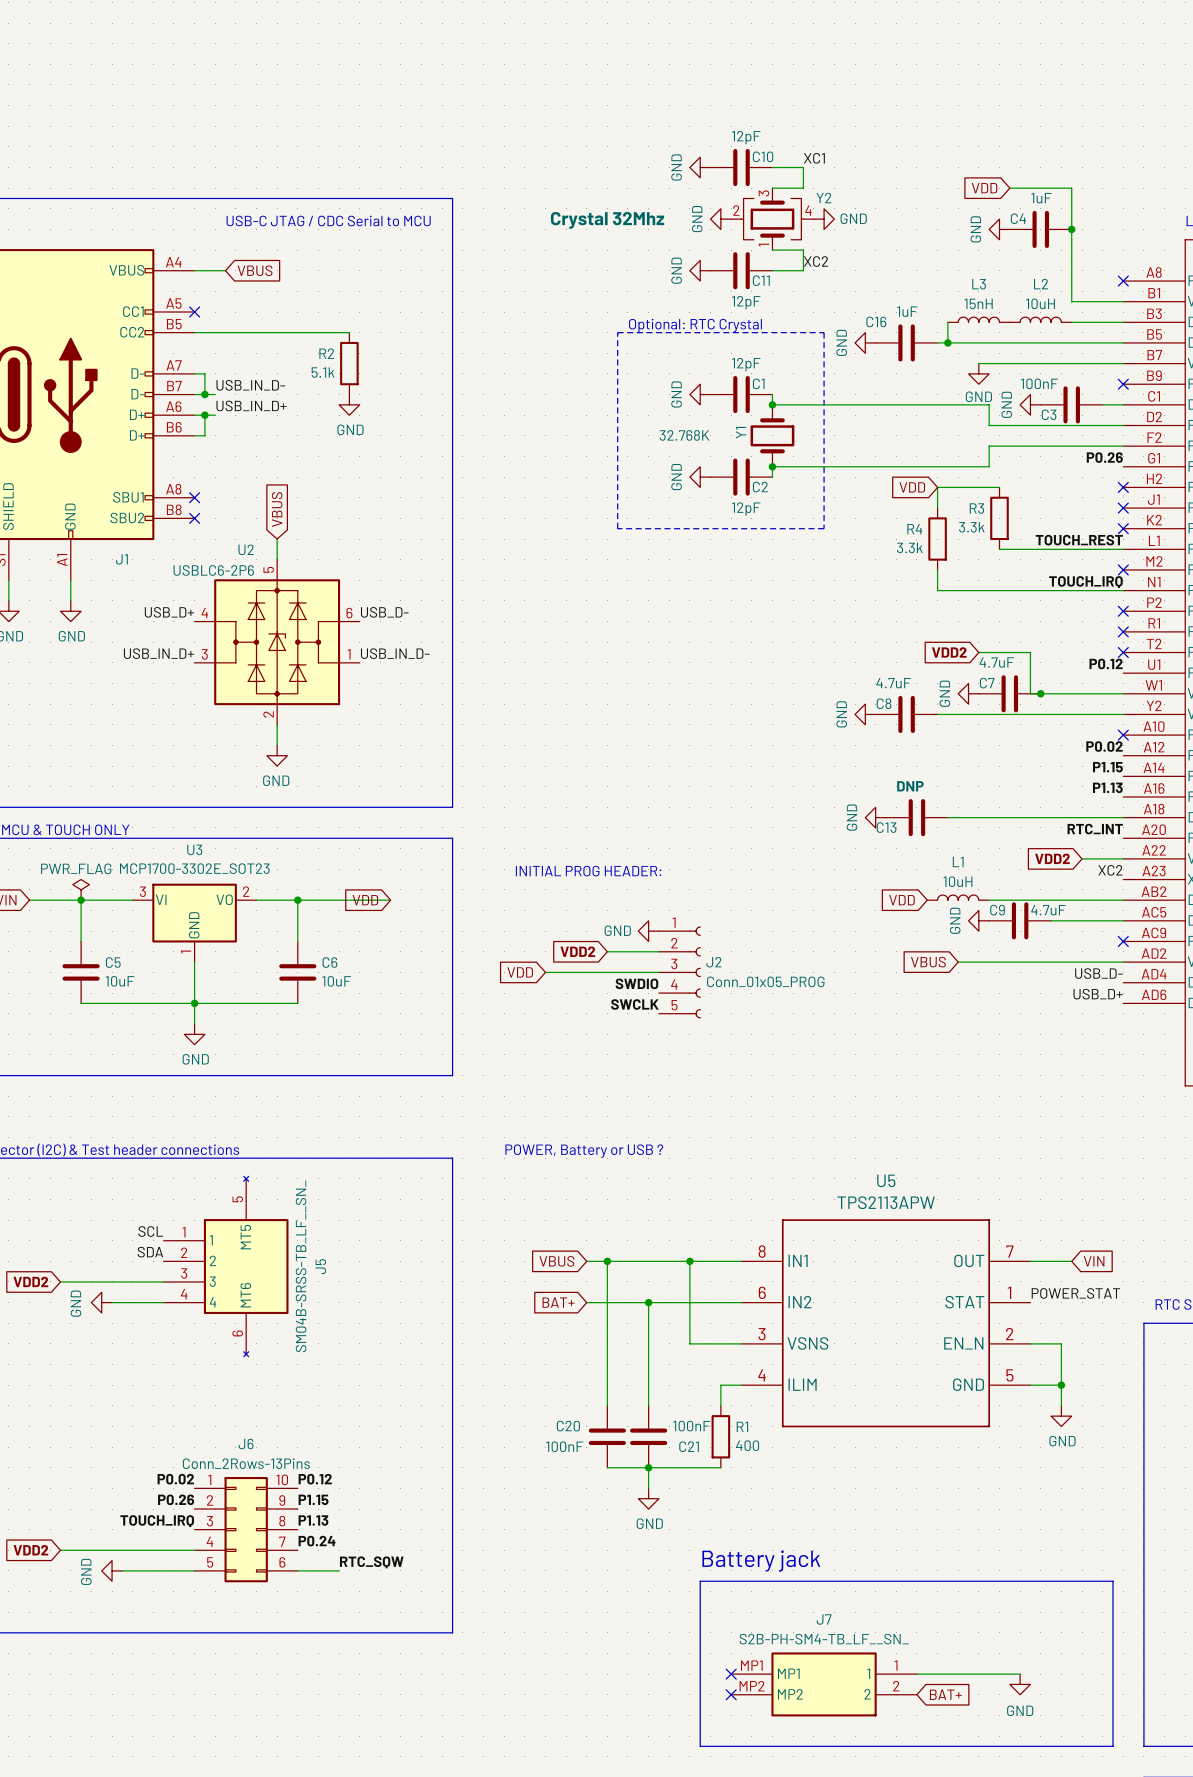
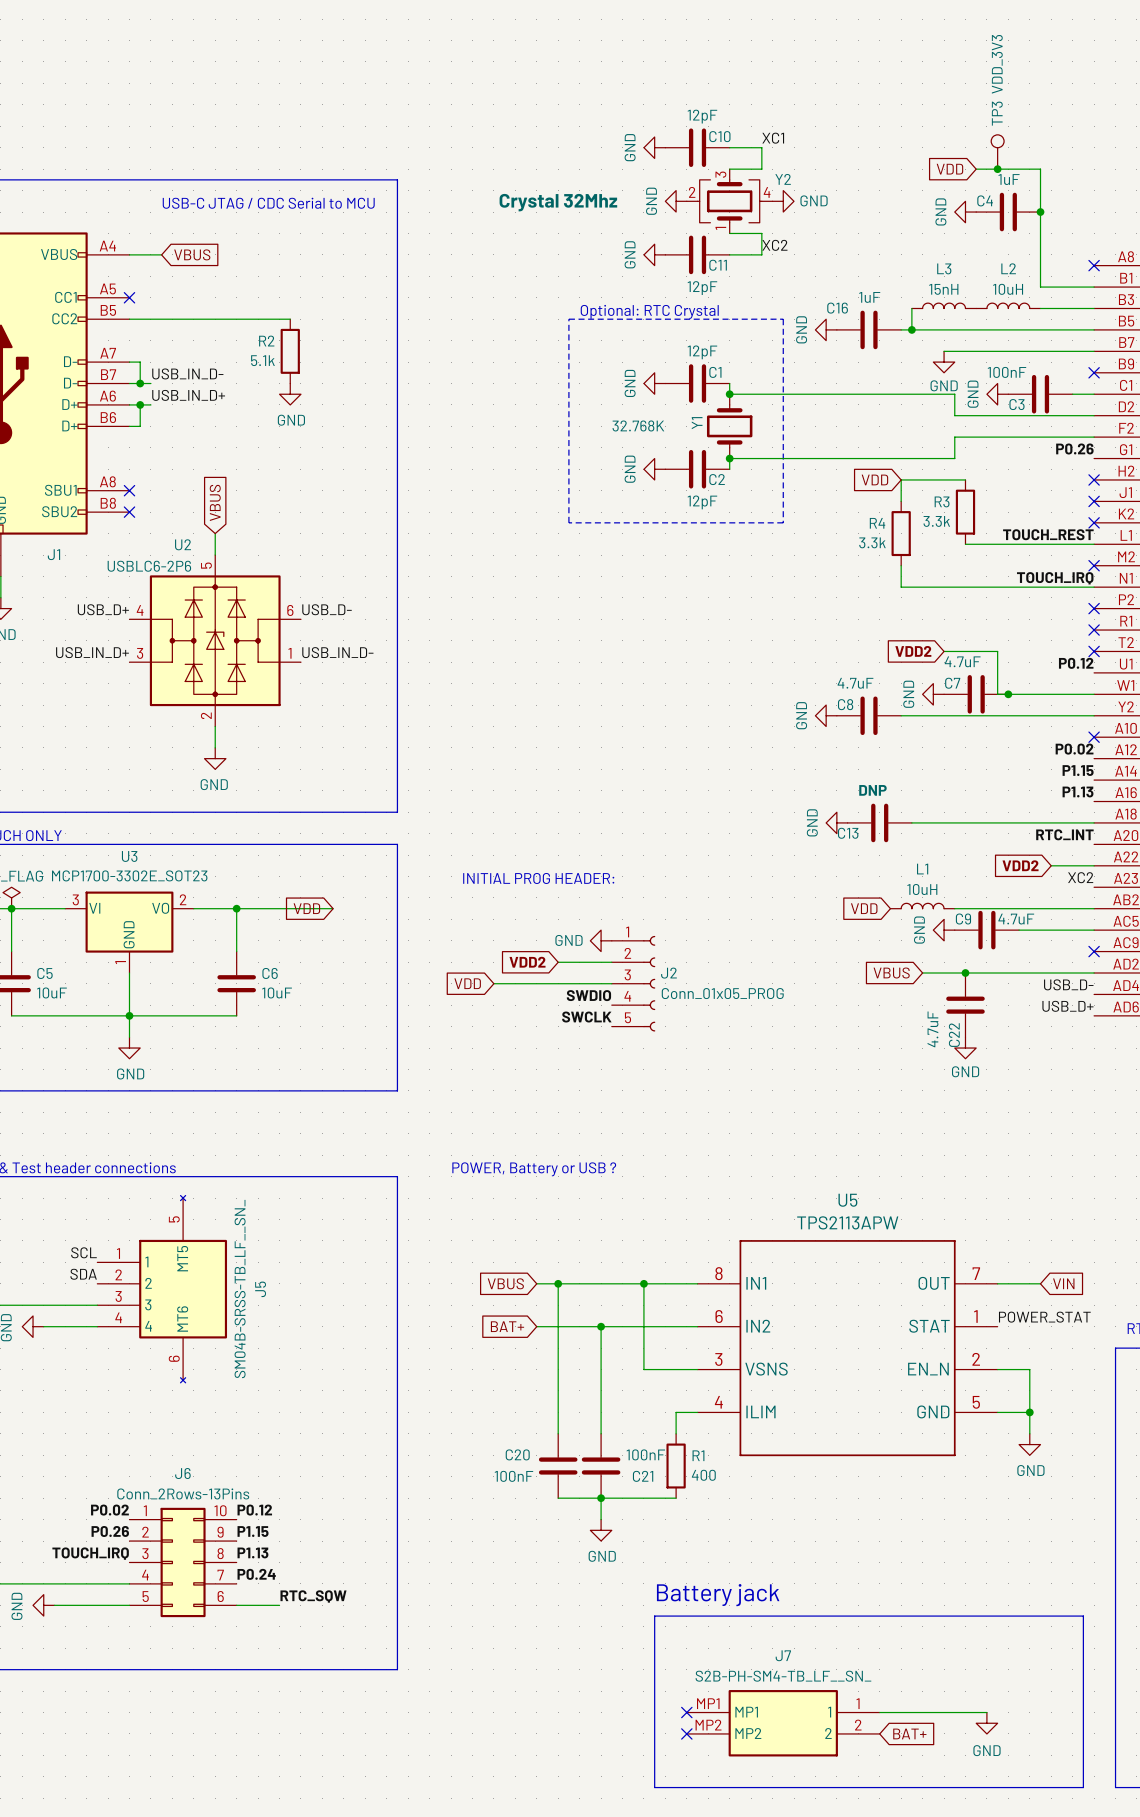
TP3: none -> VDD_3V3 (997, 152)
junction: none -> (997, 169)
junction: none -> (965, 972)
C22: none -> 4.7uF (965, 1005)
power symbol: none -> GND (965, 1048)

